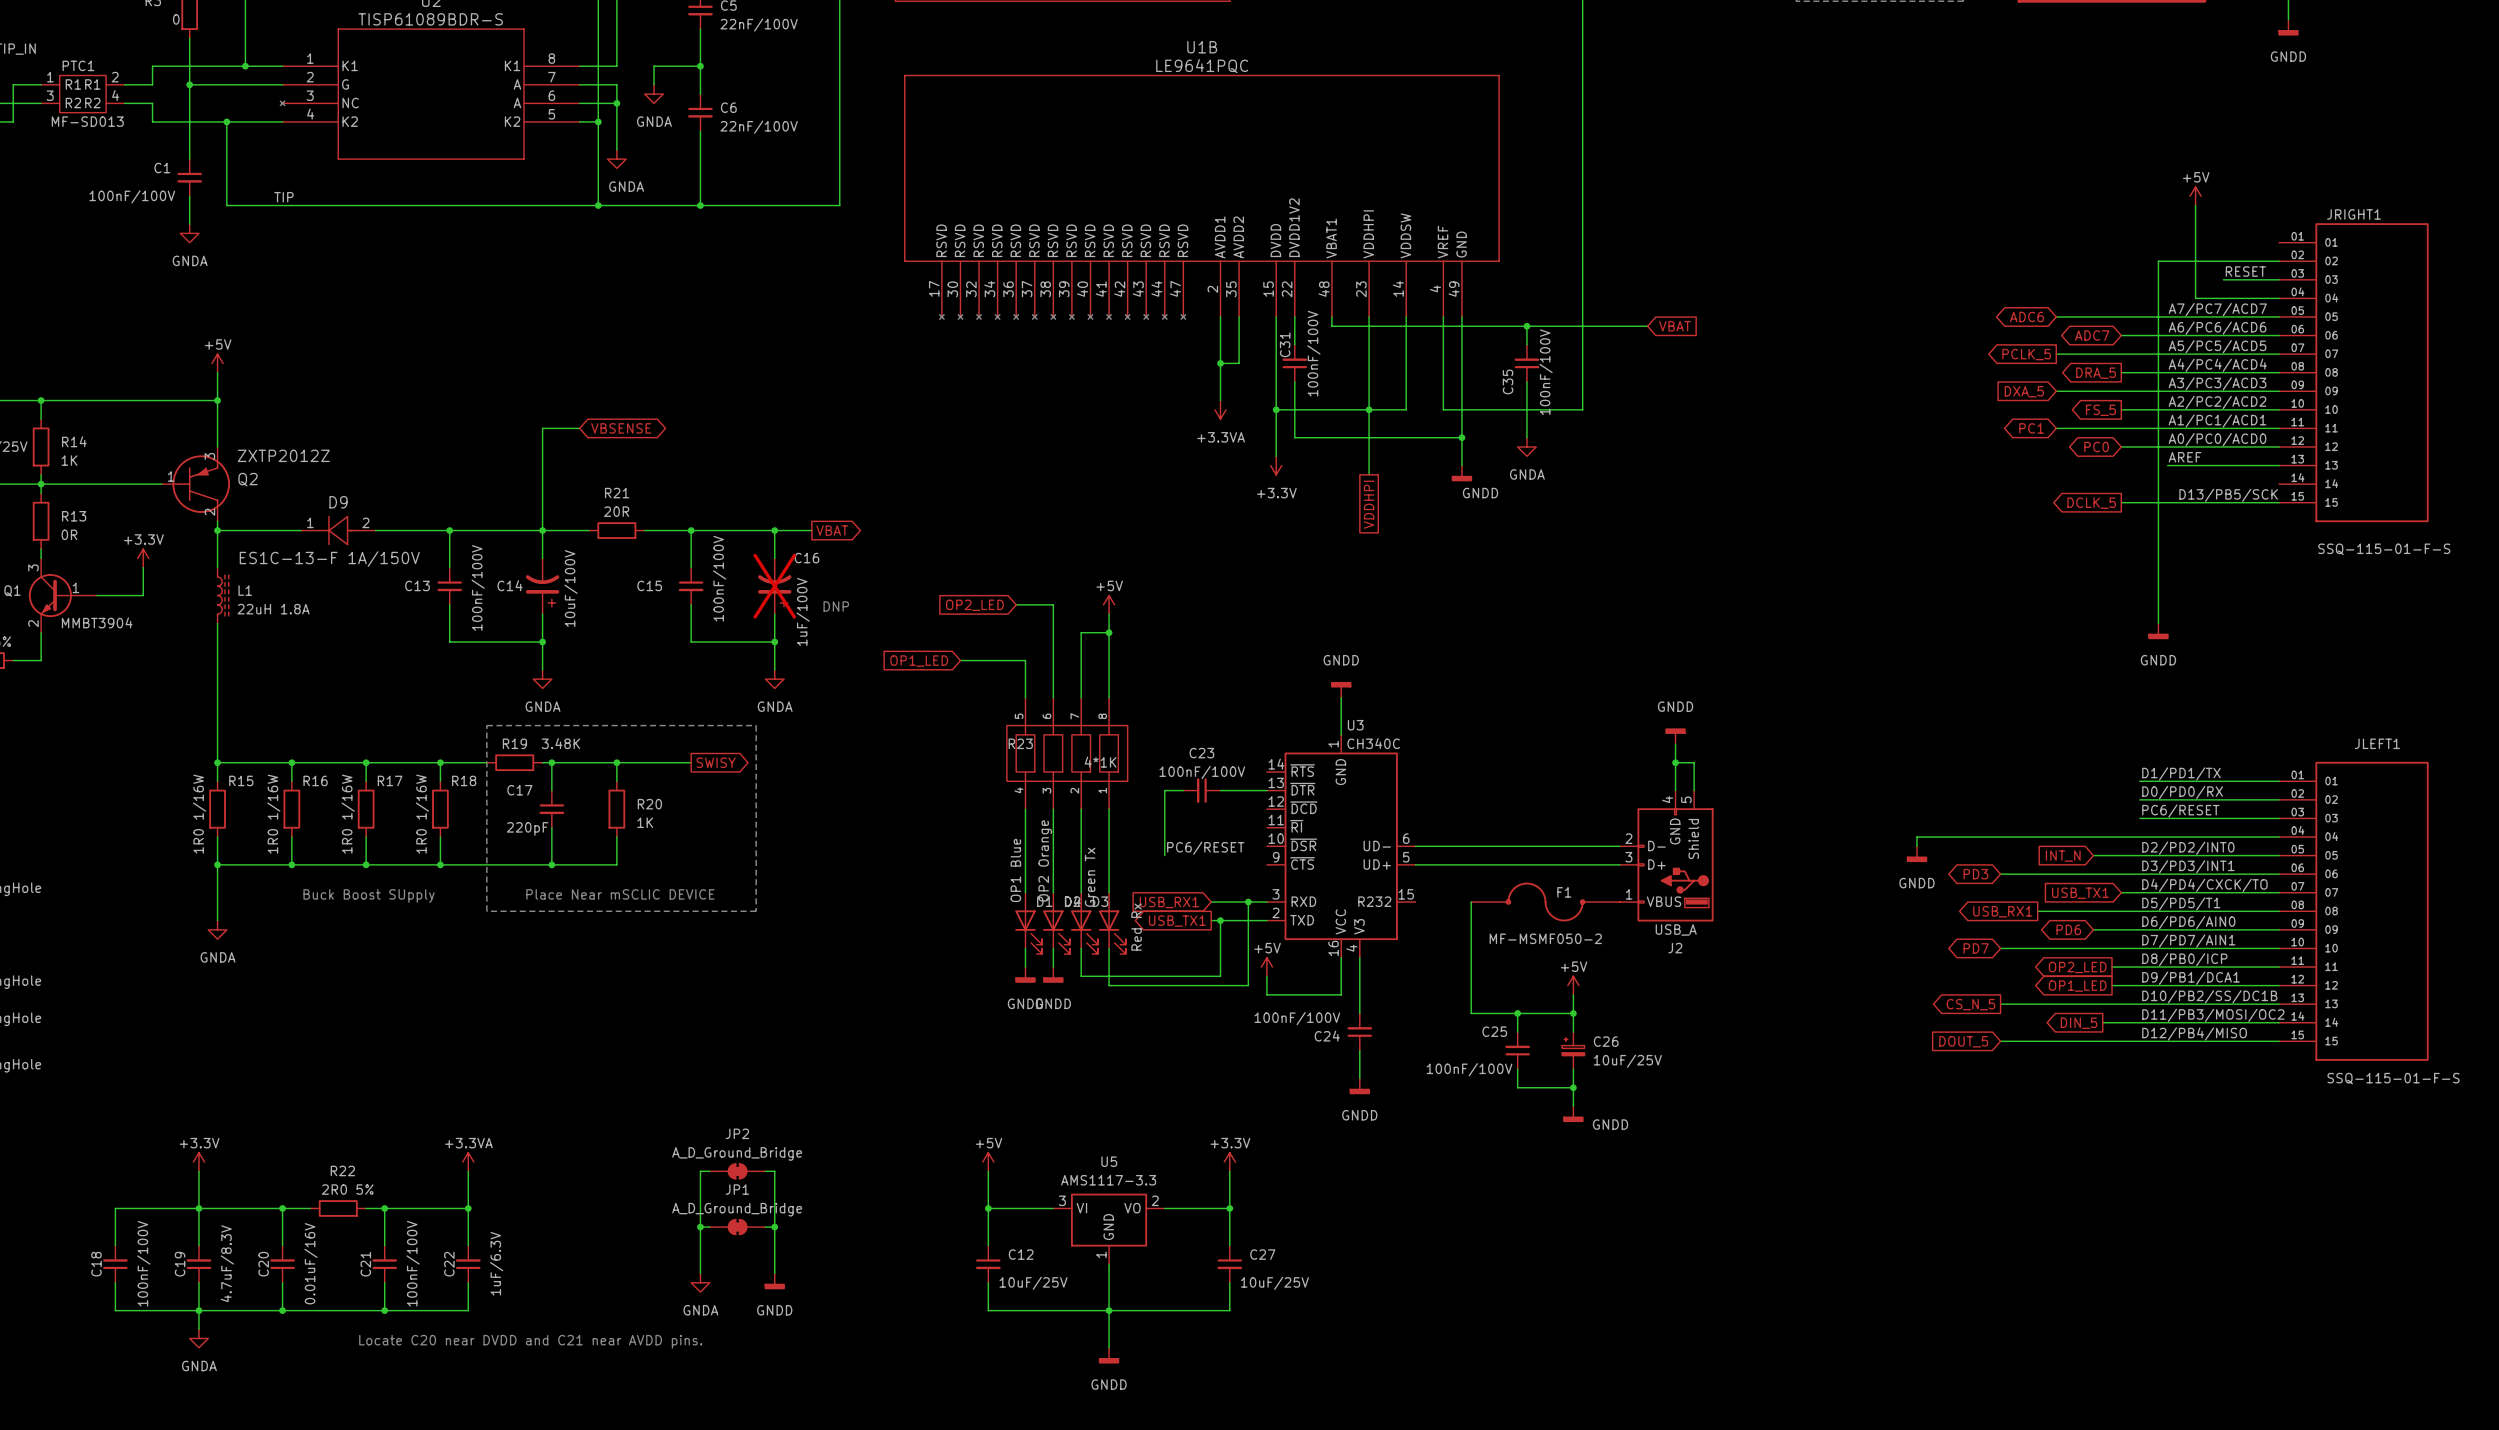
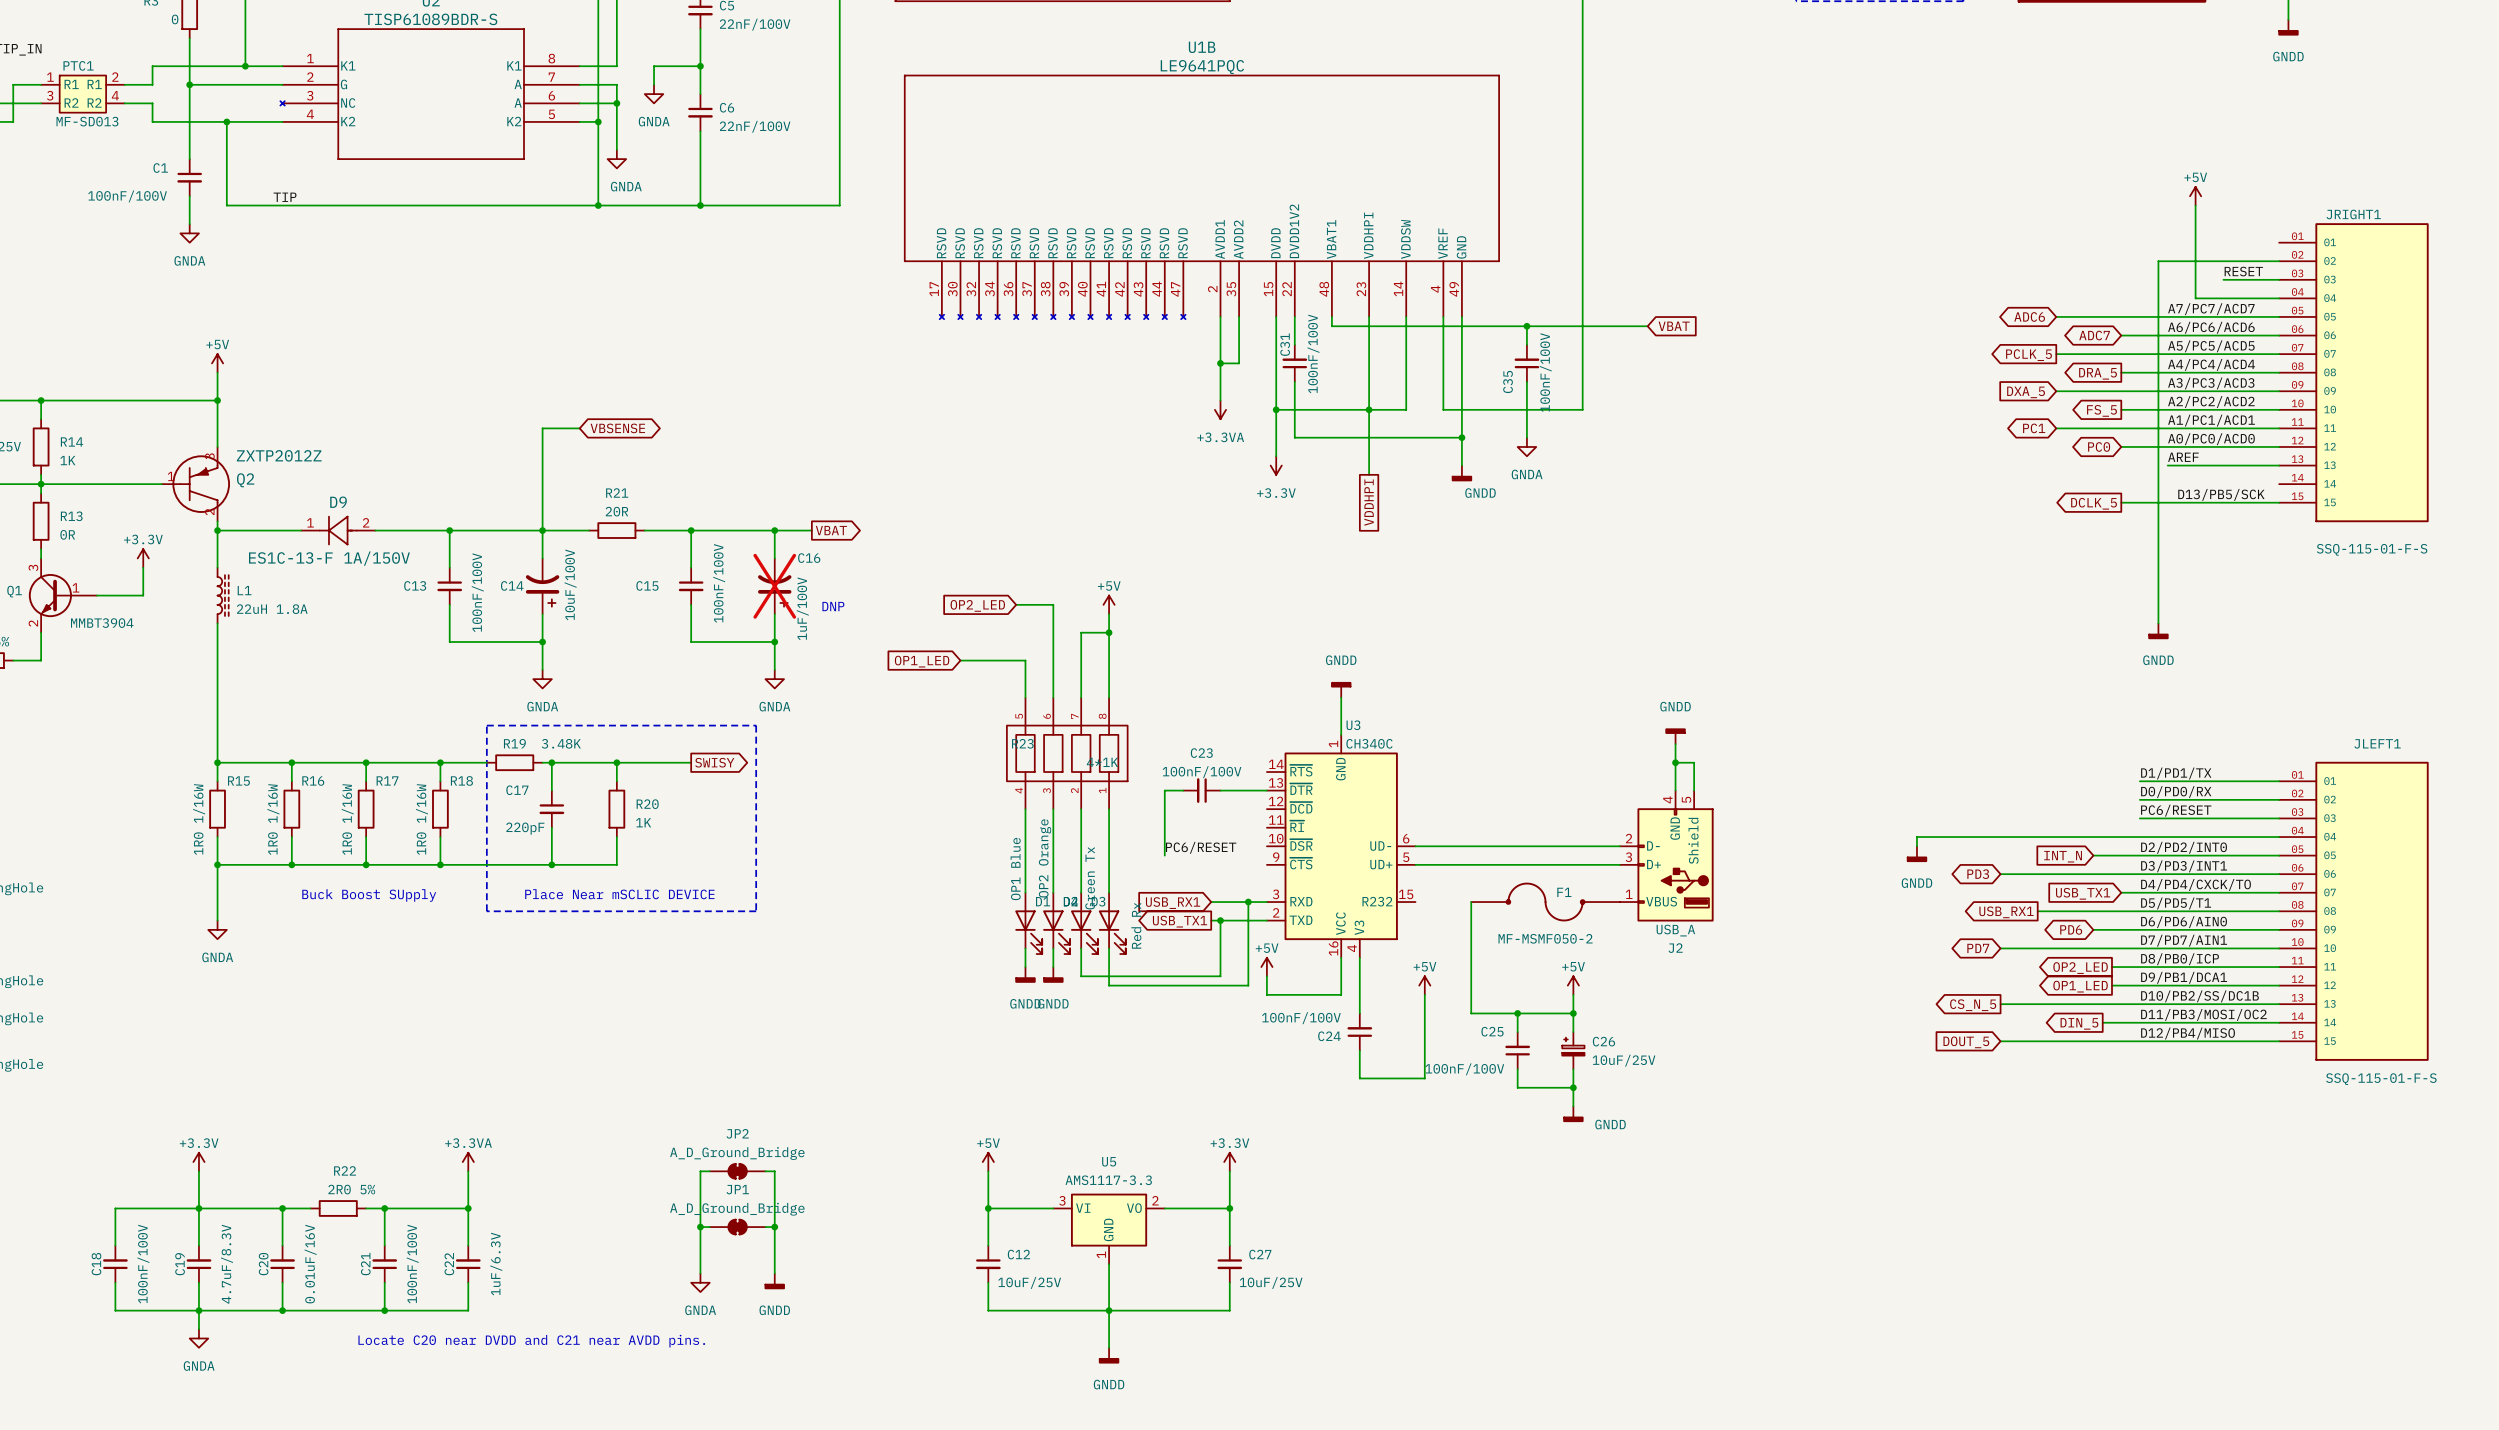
power symbol: none -> +5V (1424, 985)
wire: none -> (1424, 994) (1424, 1078) (1359, 1078)
power symbol: GNDD (1359, 1086) -> none

